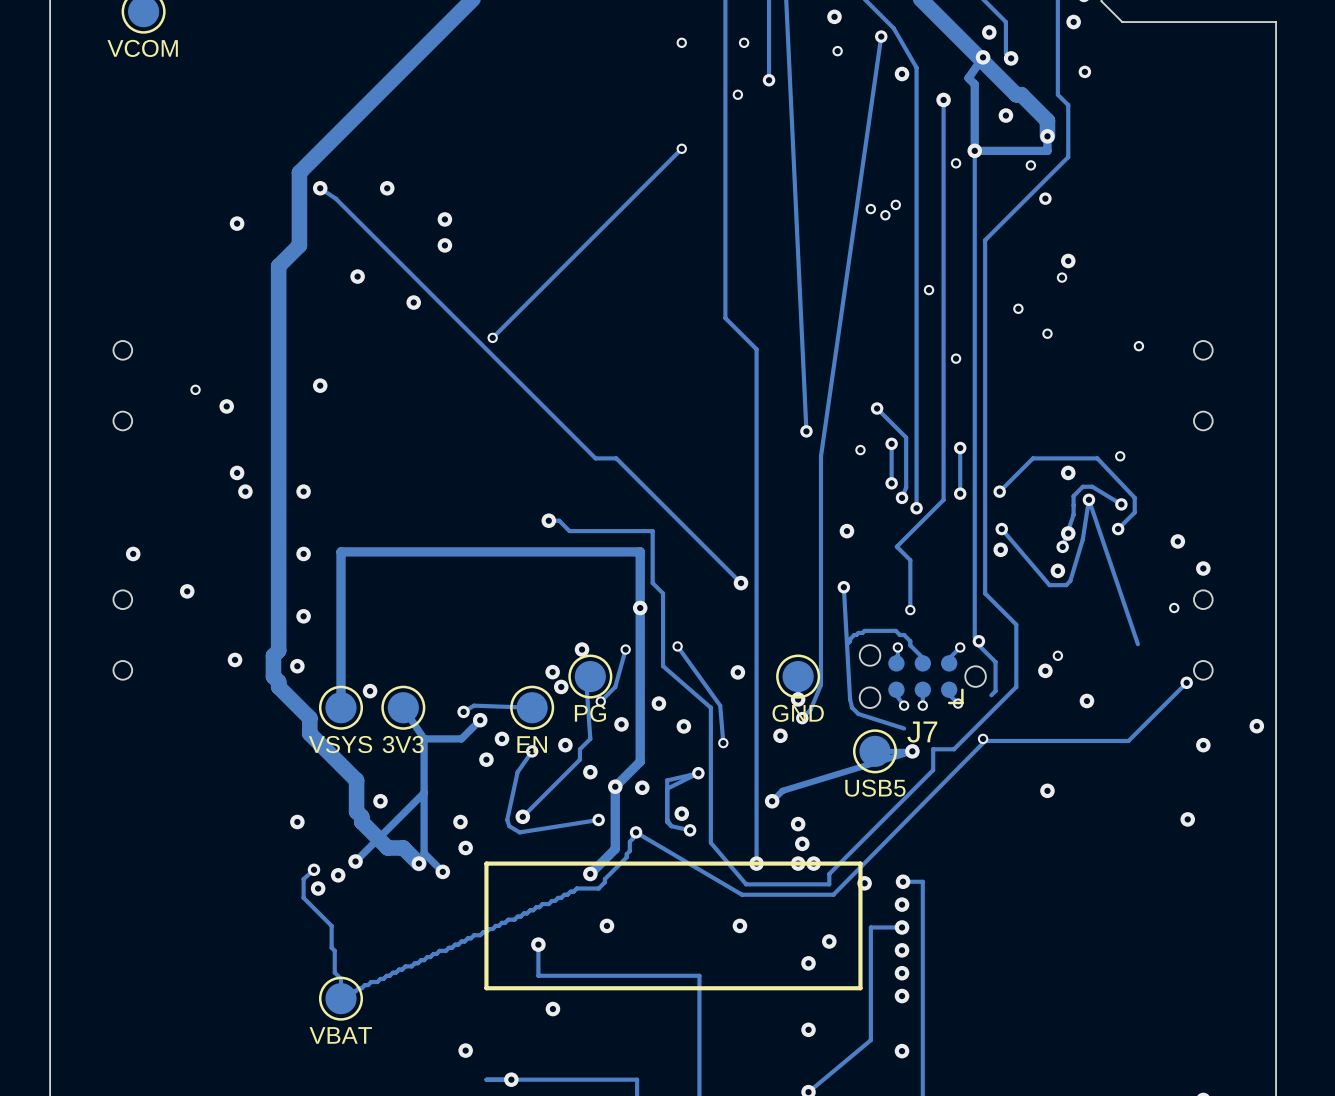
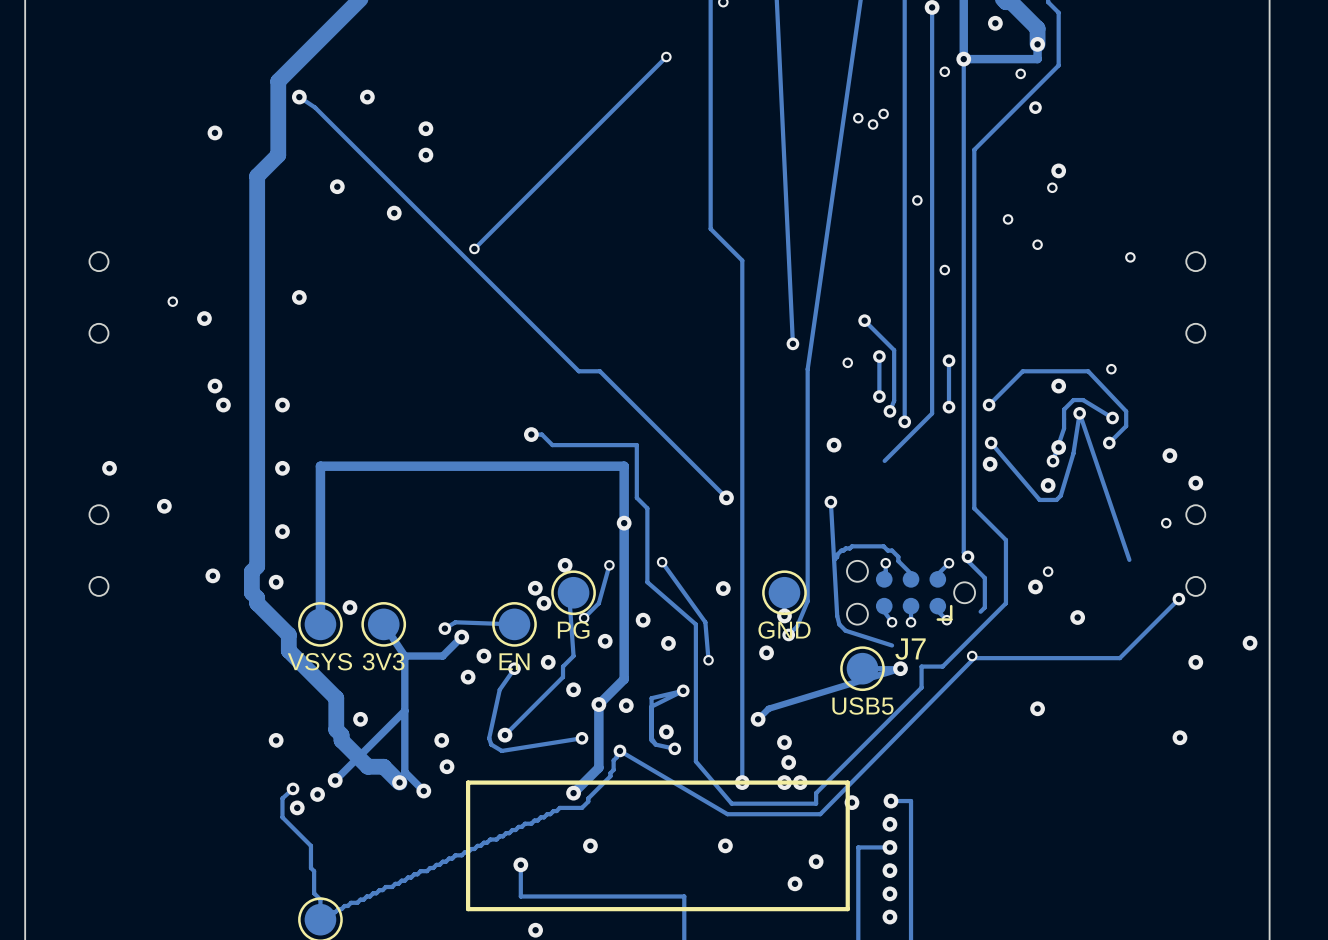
track: (896, 546) (910, 560) (910, 610) -> none
via: (910, 610) -> none

